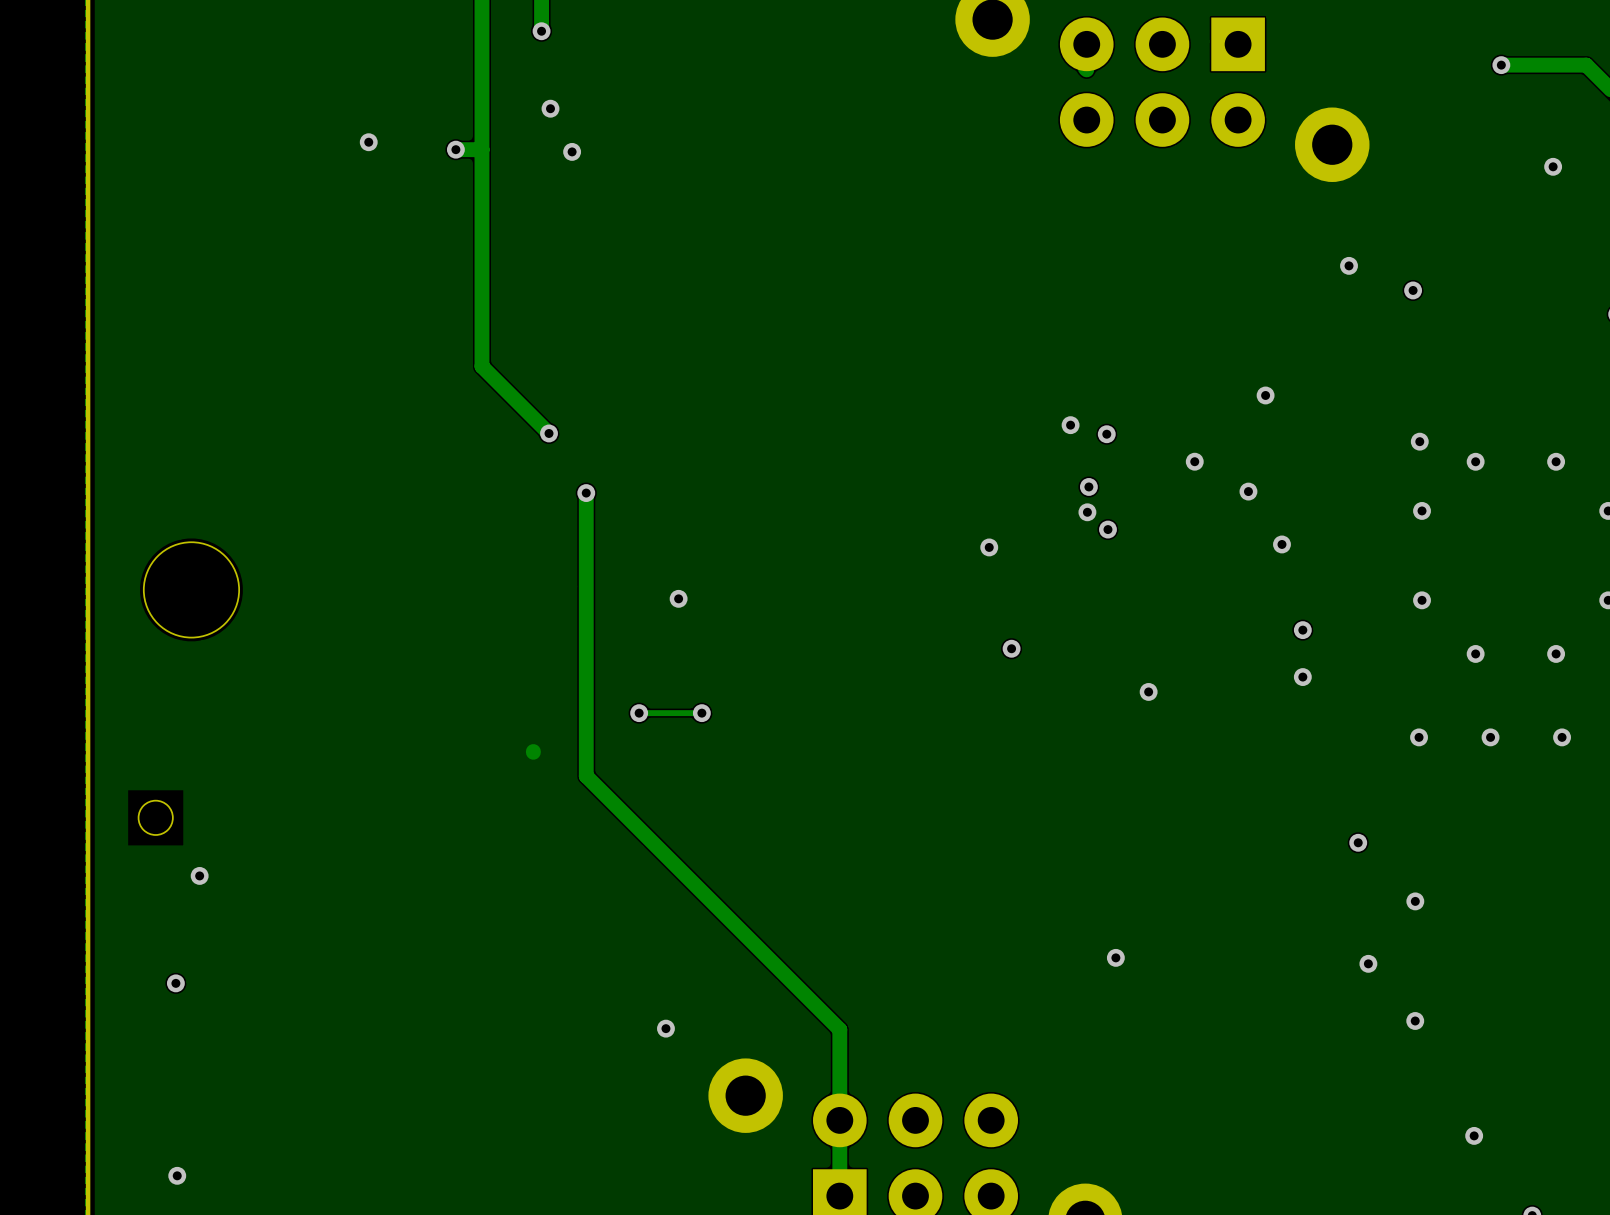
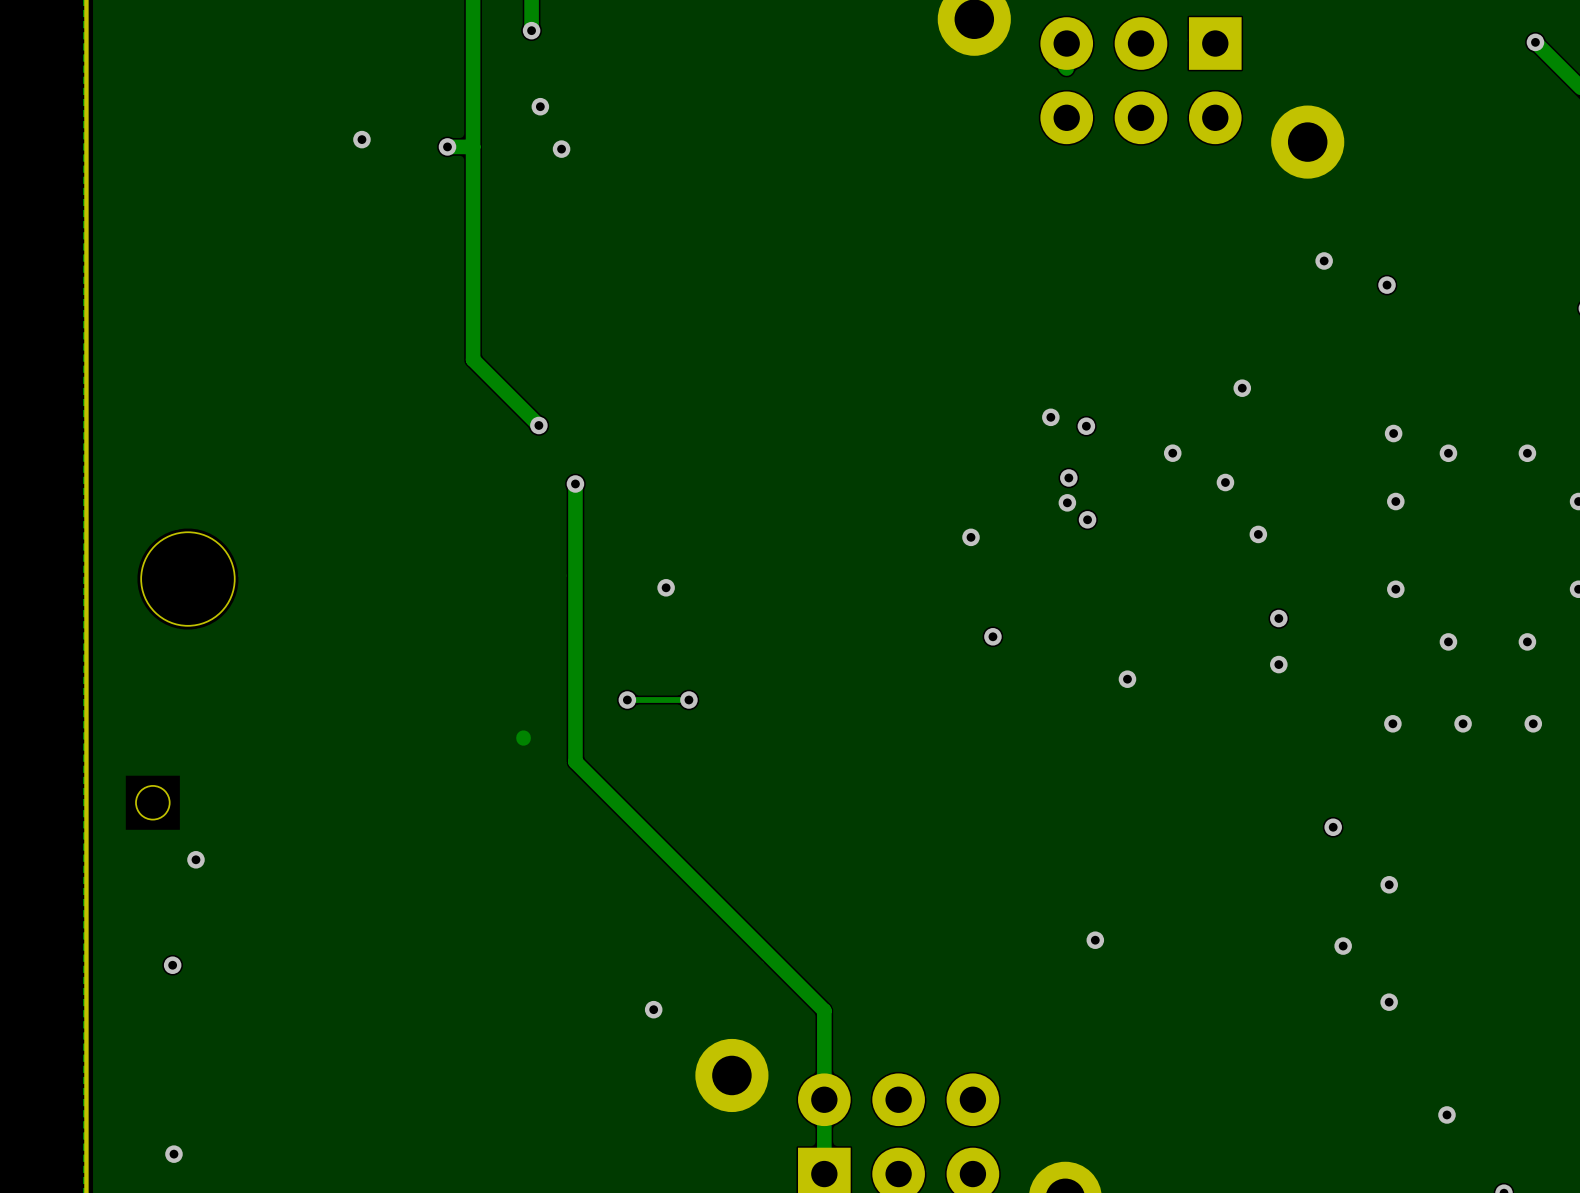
via: none -> (1535, 42)
via: (1501, 65) -> none
track: (1586, 65) (1501, 65) -> (1557, 63) (1535, 42)
via: (1553, 166) -> none

